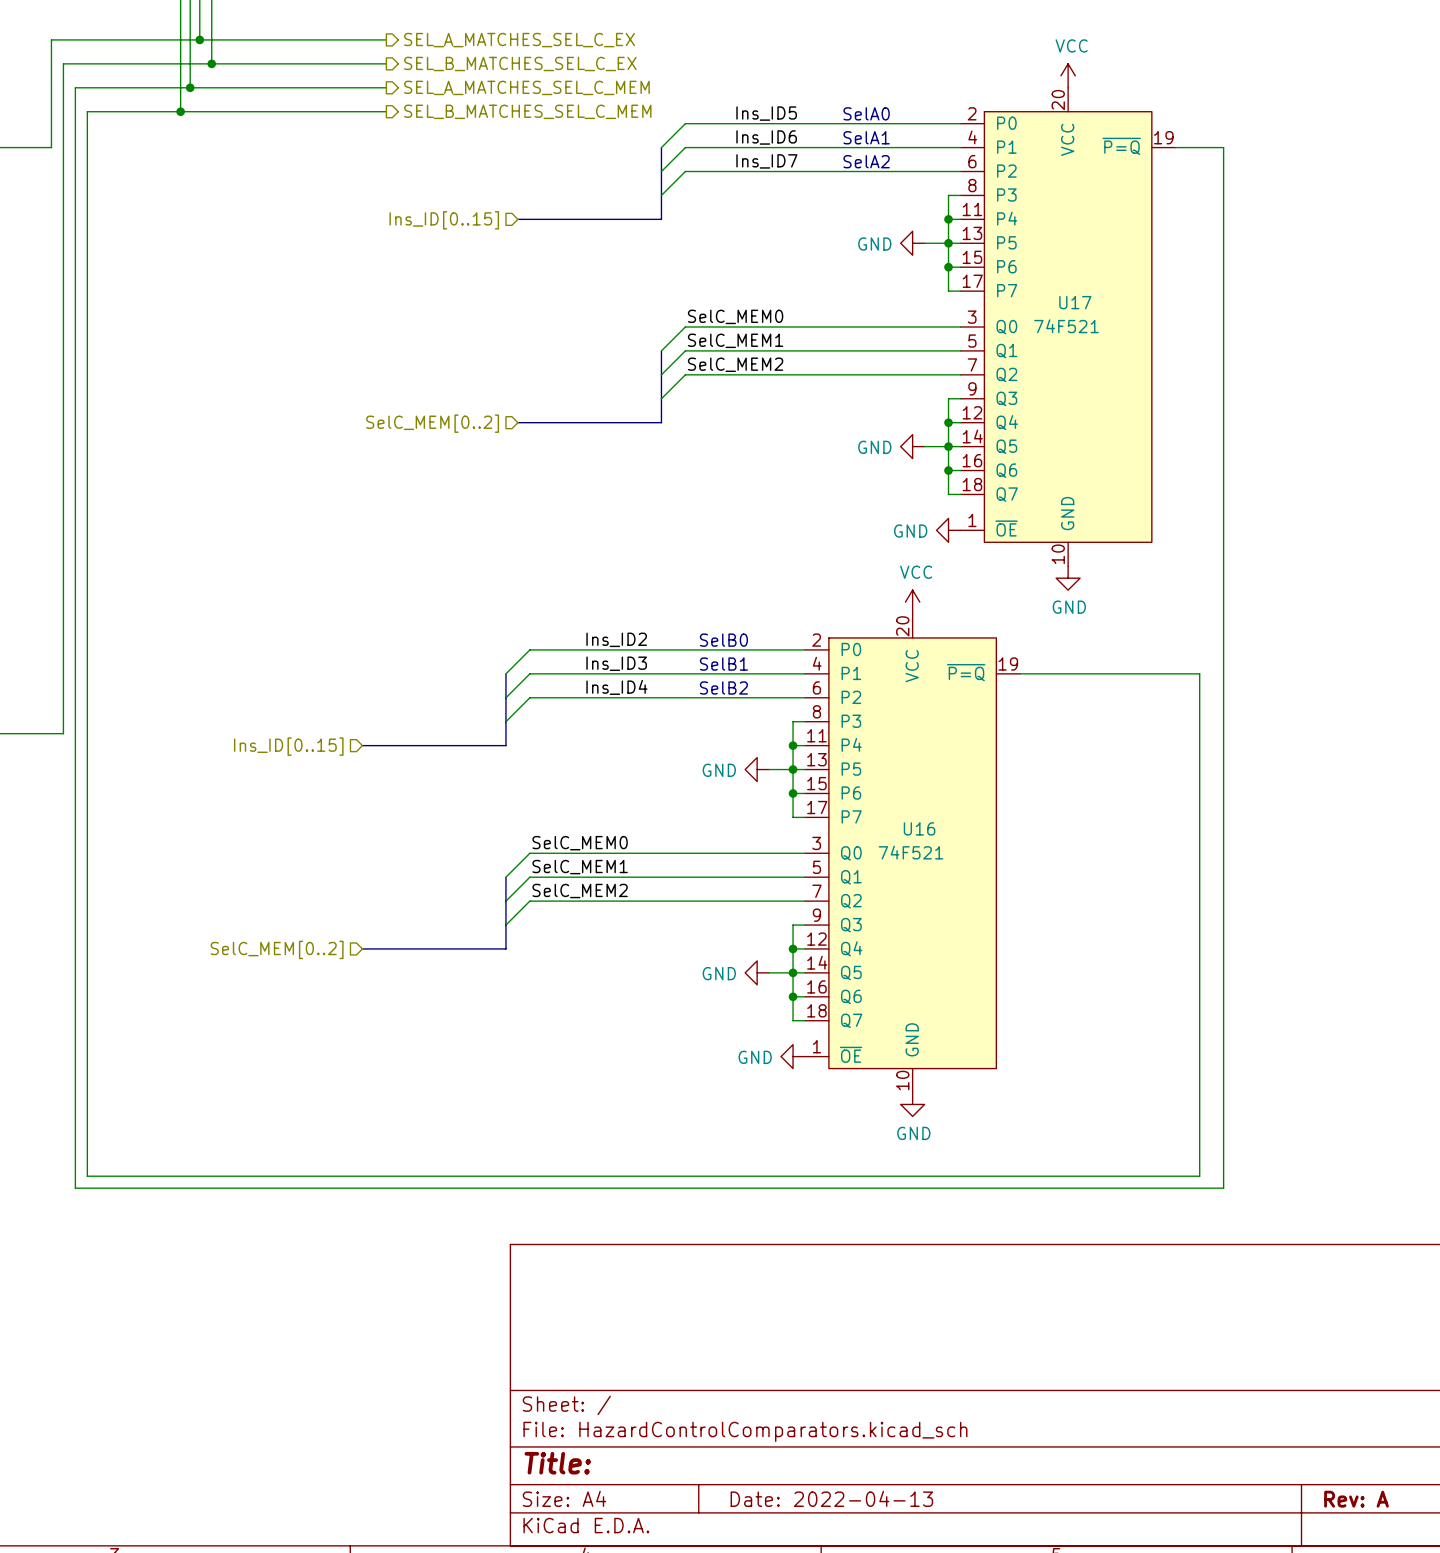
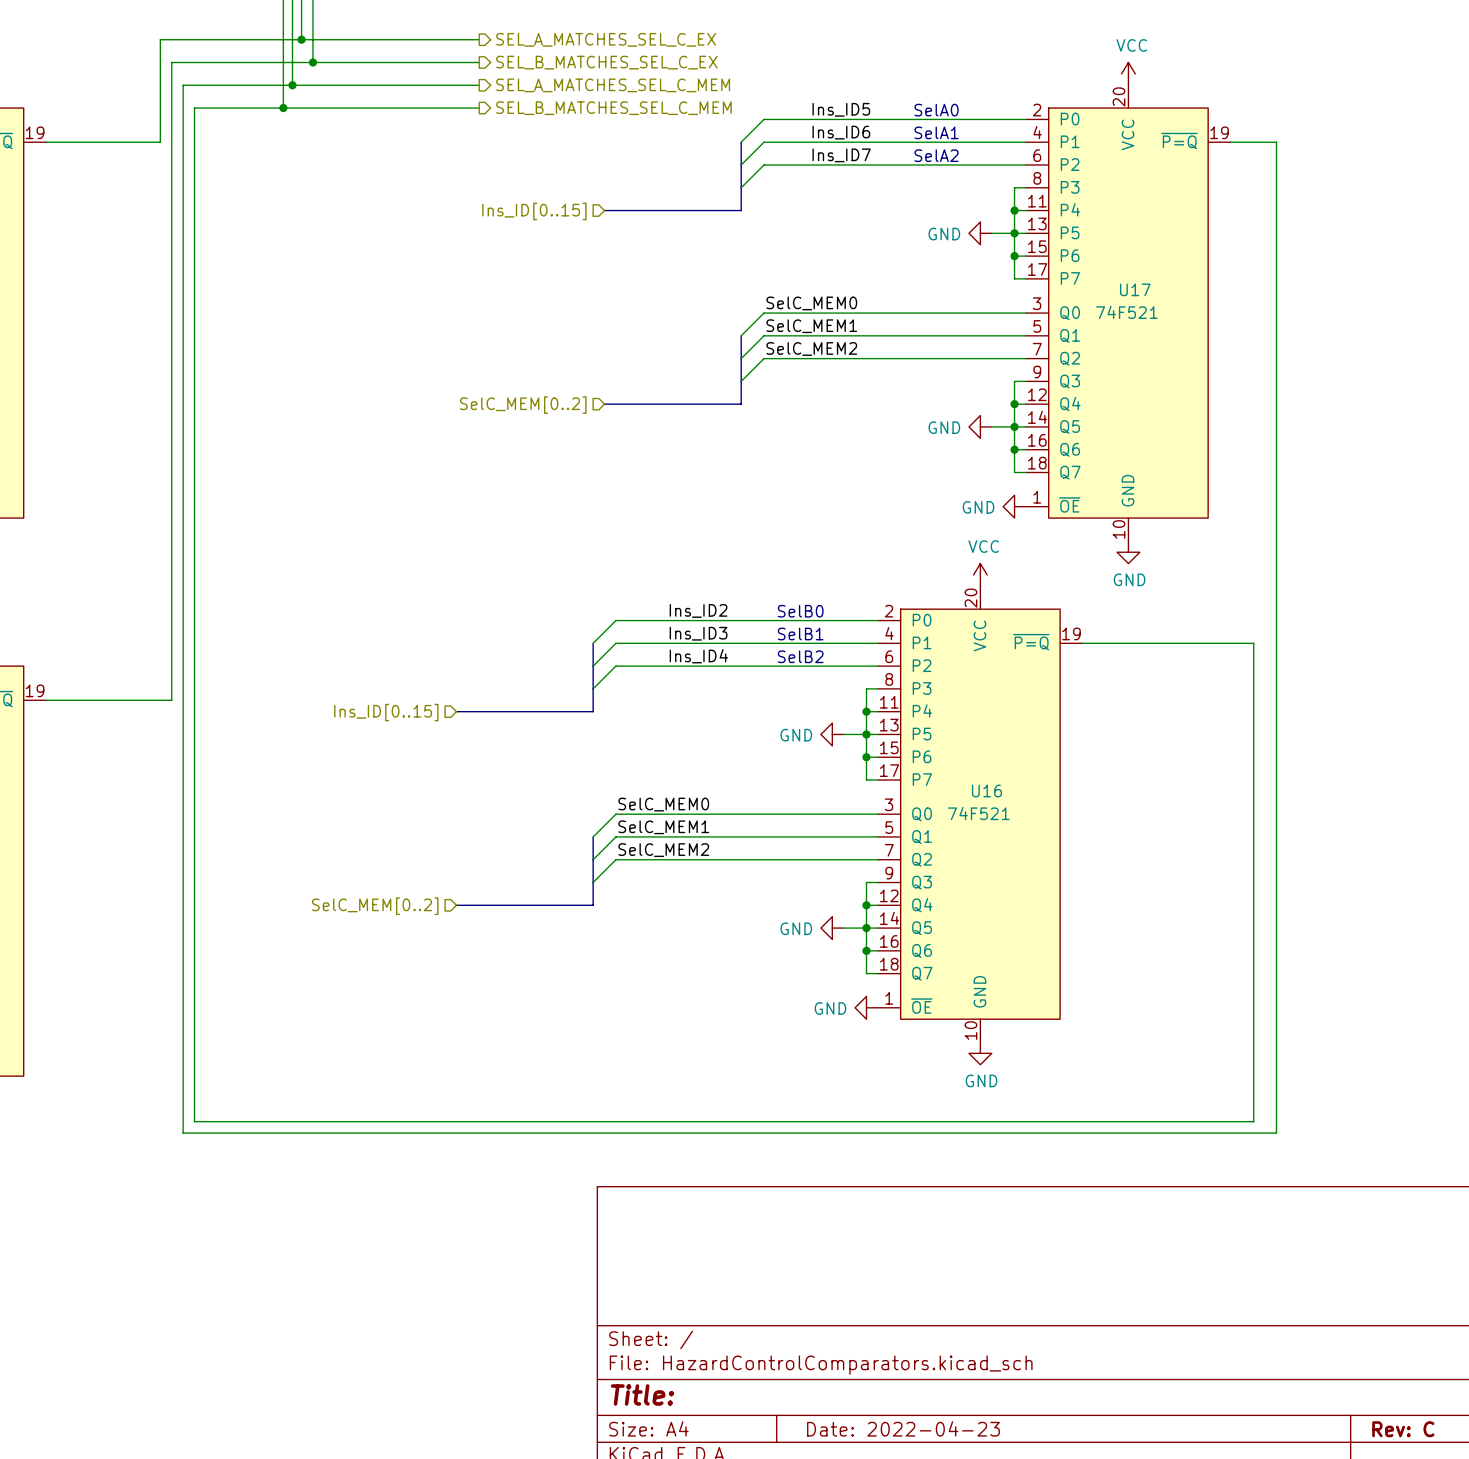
title block: Date: 2022-04-13 (831, 1498) -> Date: 2022-04-23 (903, 1428)
title block: Rev: A (1356, 1499) -> Rev: C (1403, 1429)

